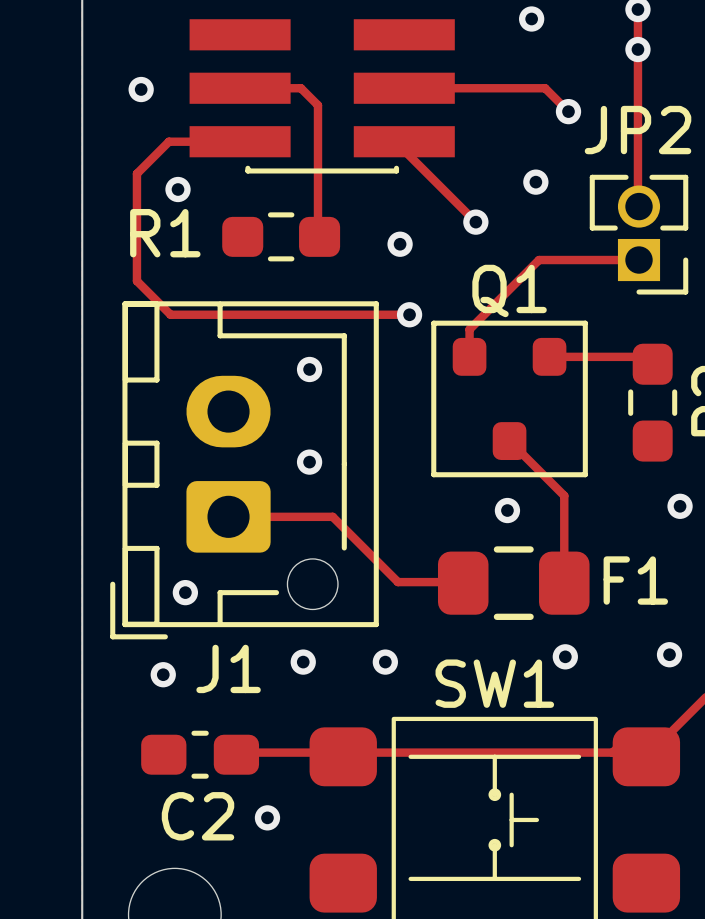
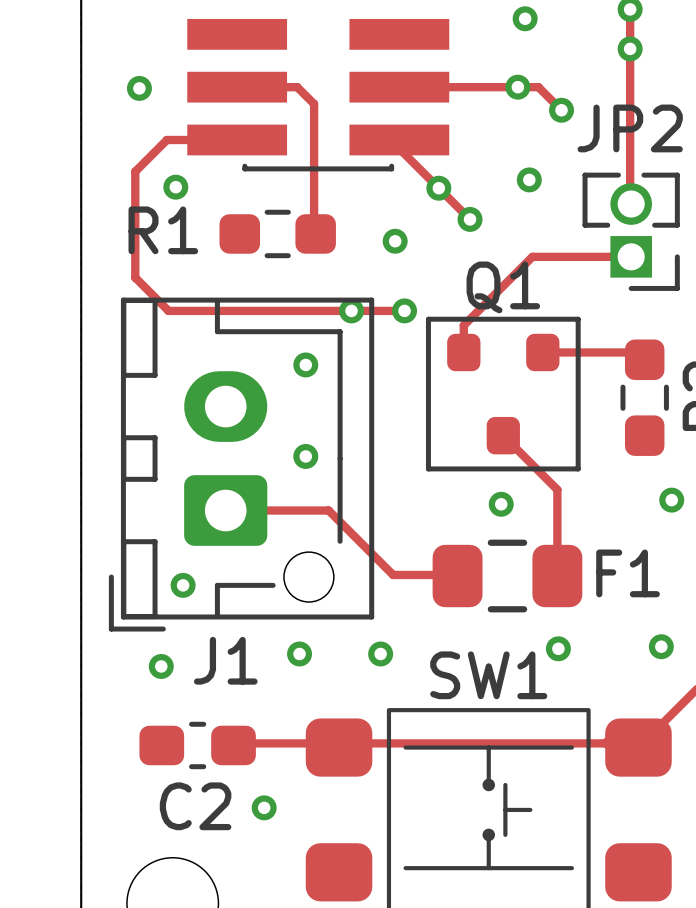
via: none -> (517, 87)
via: none -> (438, 188)
via: none -> (351, 310)

